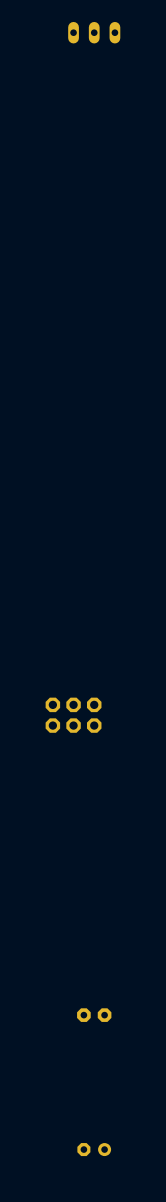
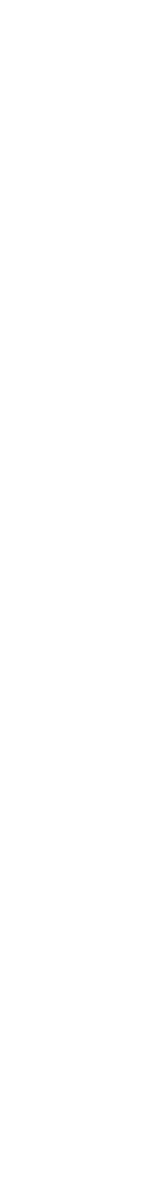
part: (94, 32) -> none
part: (73, 715) -> none
part: (94, 1015) -> none
part: (94, 1149) -> none

